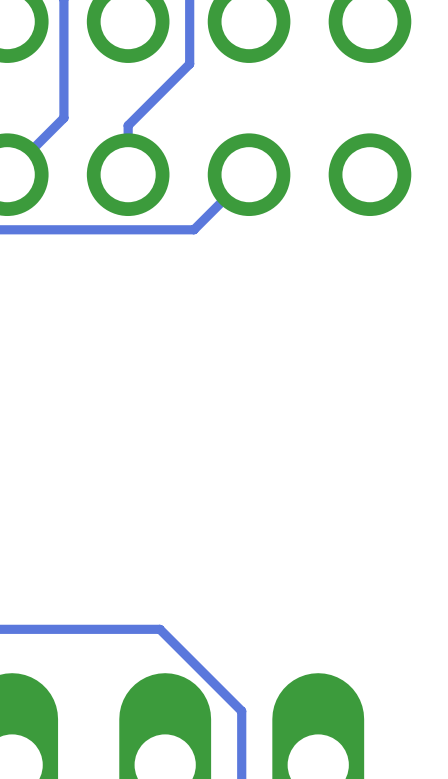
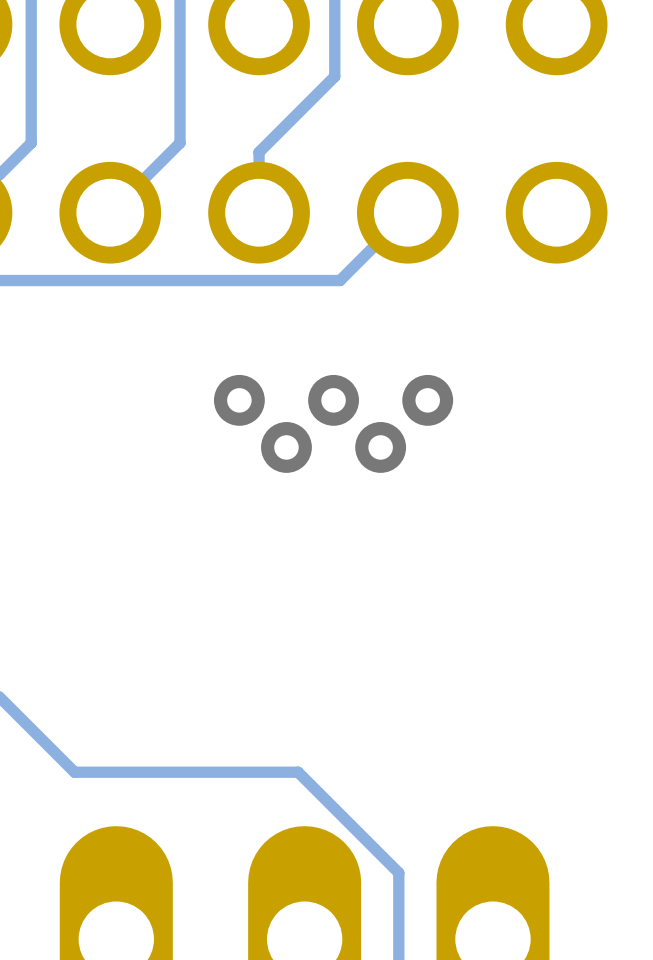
via: none -> (239, 400)
via: none -> (333, 400)
via: none -> (427, 400)
via: none -> (286, 447)
via: none -> (380, 447)

